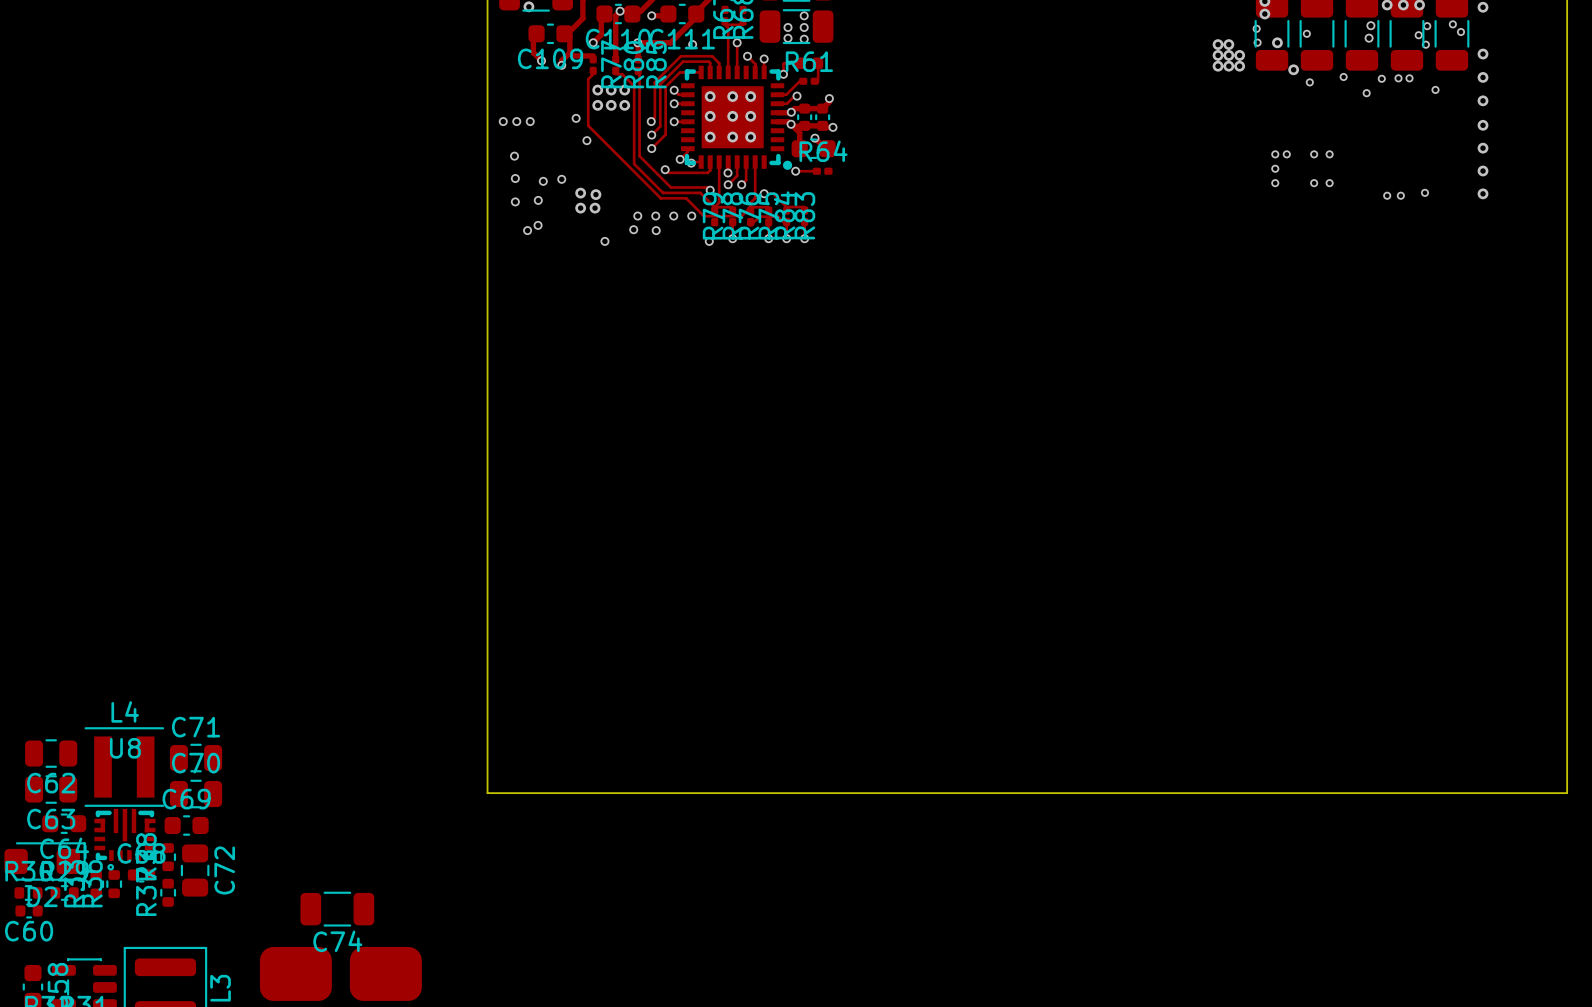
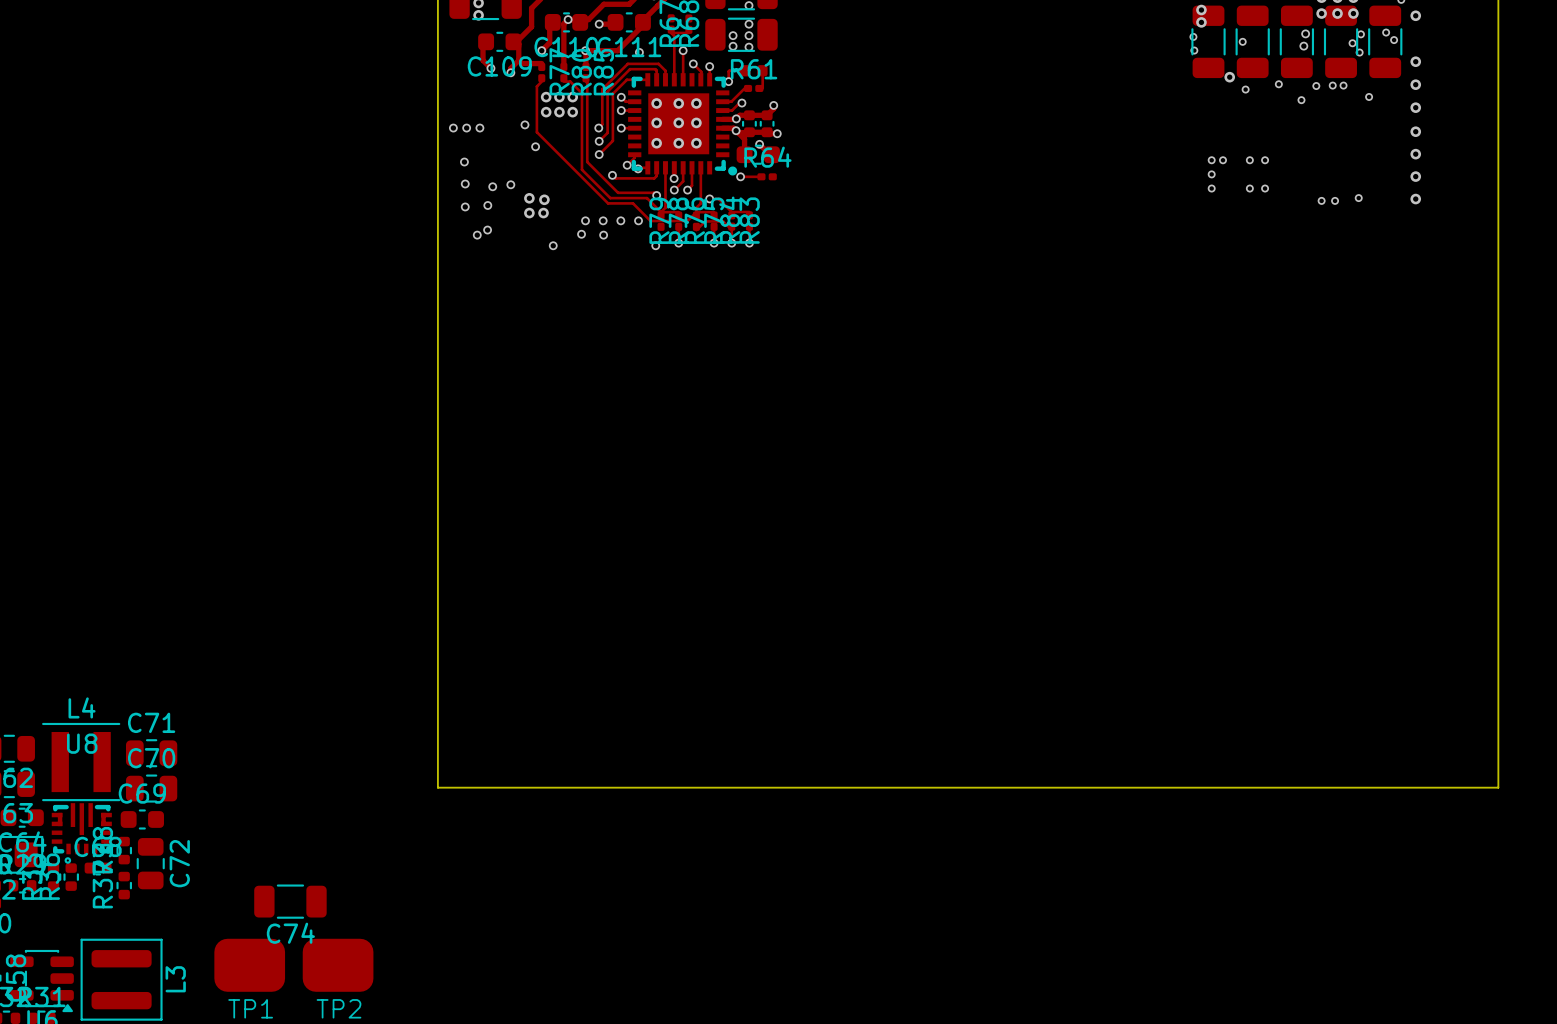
via: (1277, 42) -> none
via: (1218, 44) -> none
via: (1228, 44) -> none
via: (1218, 55) -> none
via: (1228, 55) -> none
via: (1239, 55) -> none
via: (1218, 66) -> none
via: (1228, 66) -> none
via: (1239, 66) -> none

